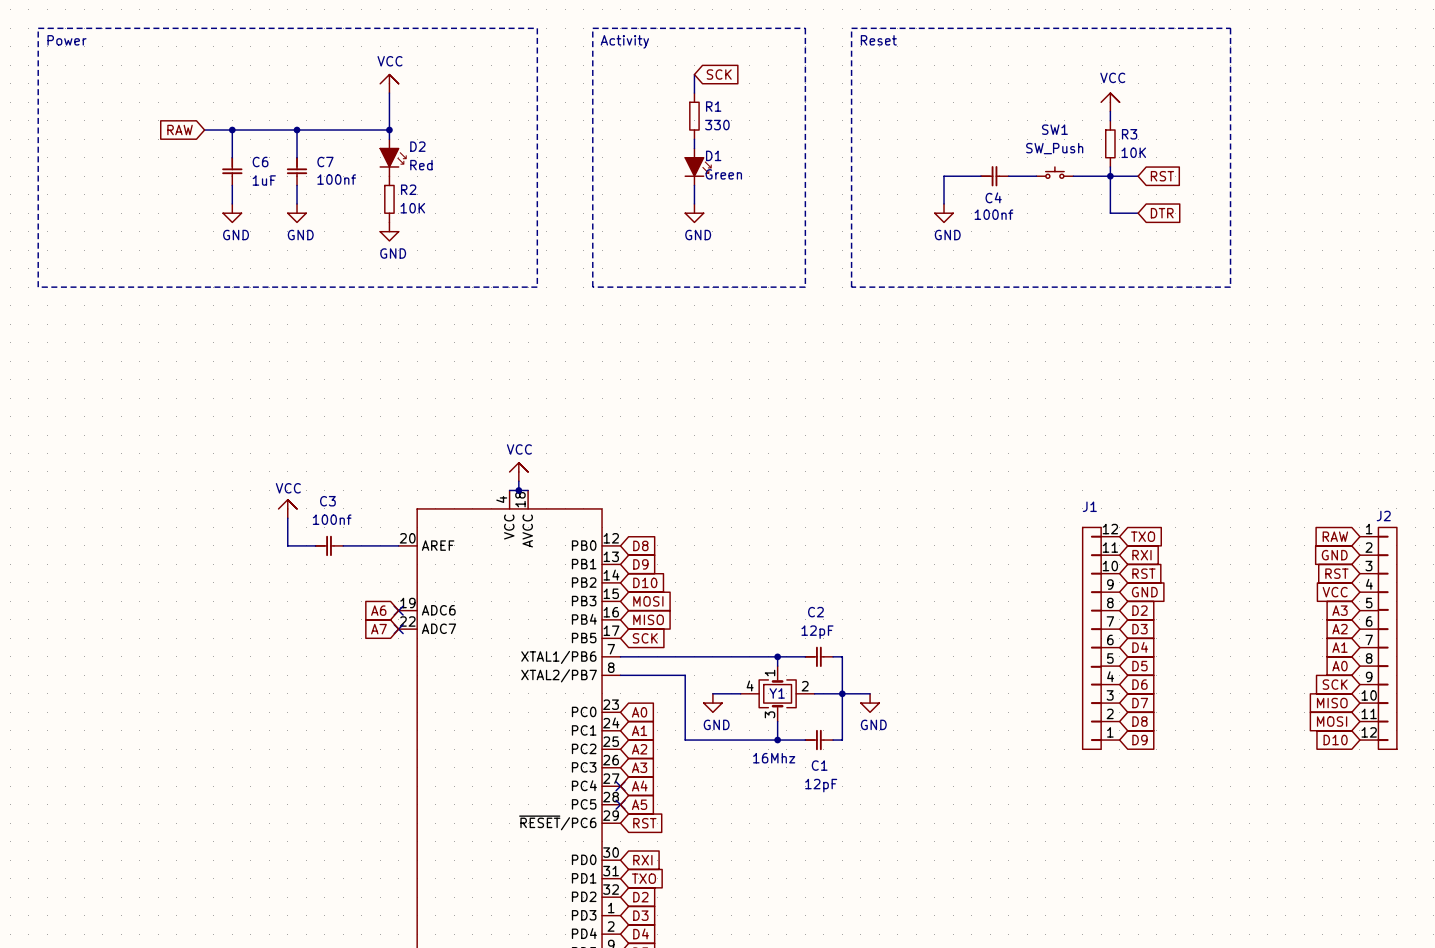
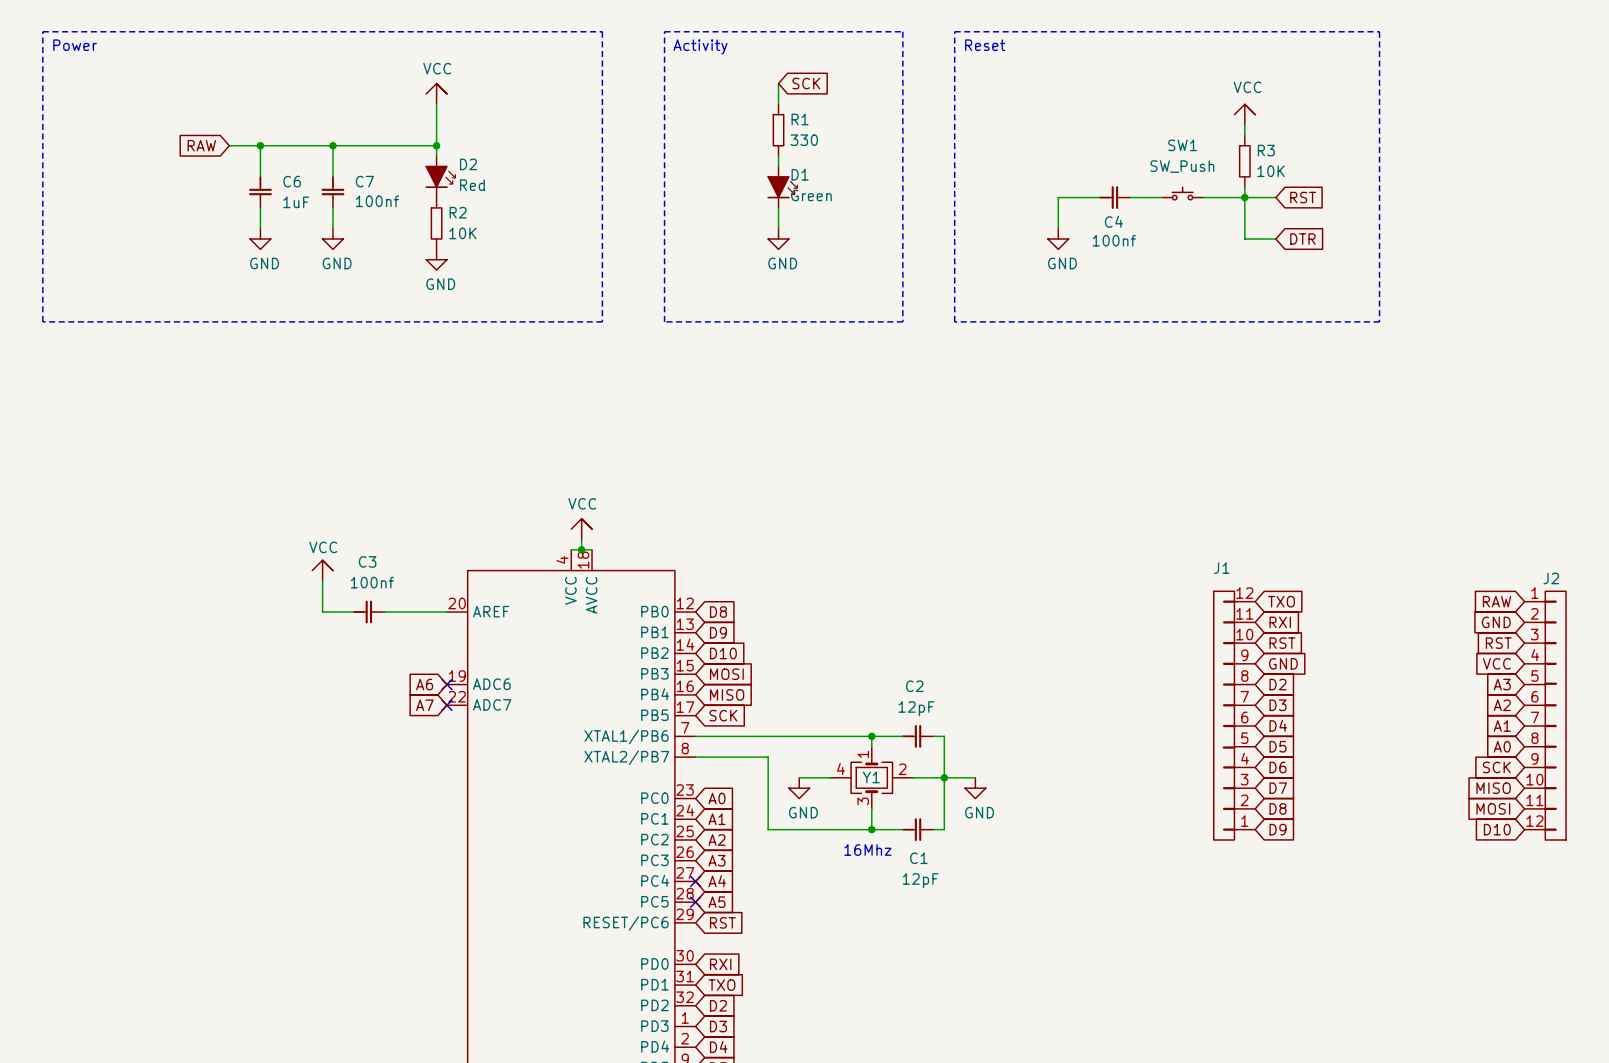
part pin name: ~{RESET}/PC6 (557, 822) -> RESET/PC6 (626, 923)

